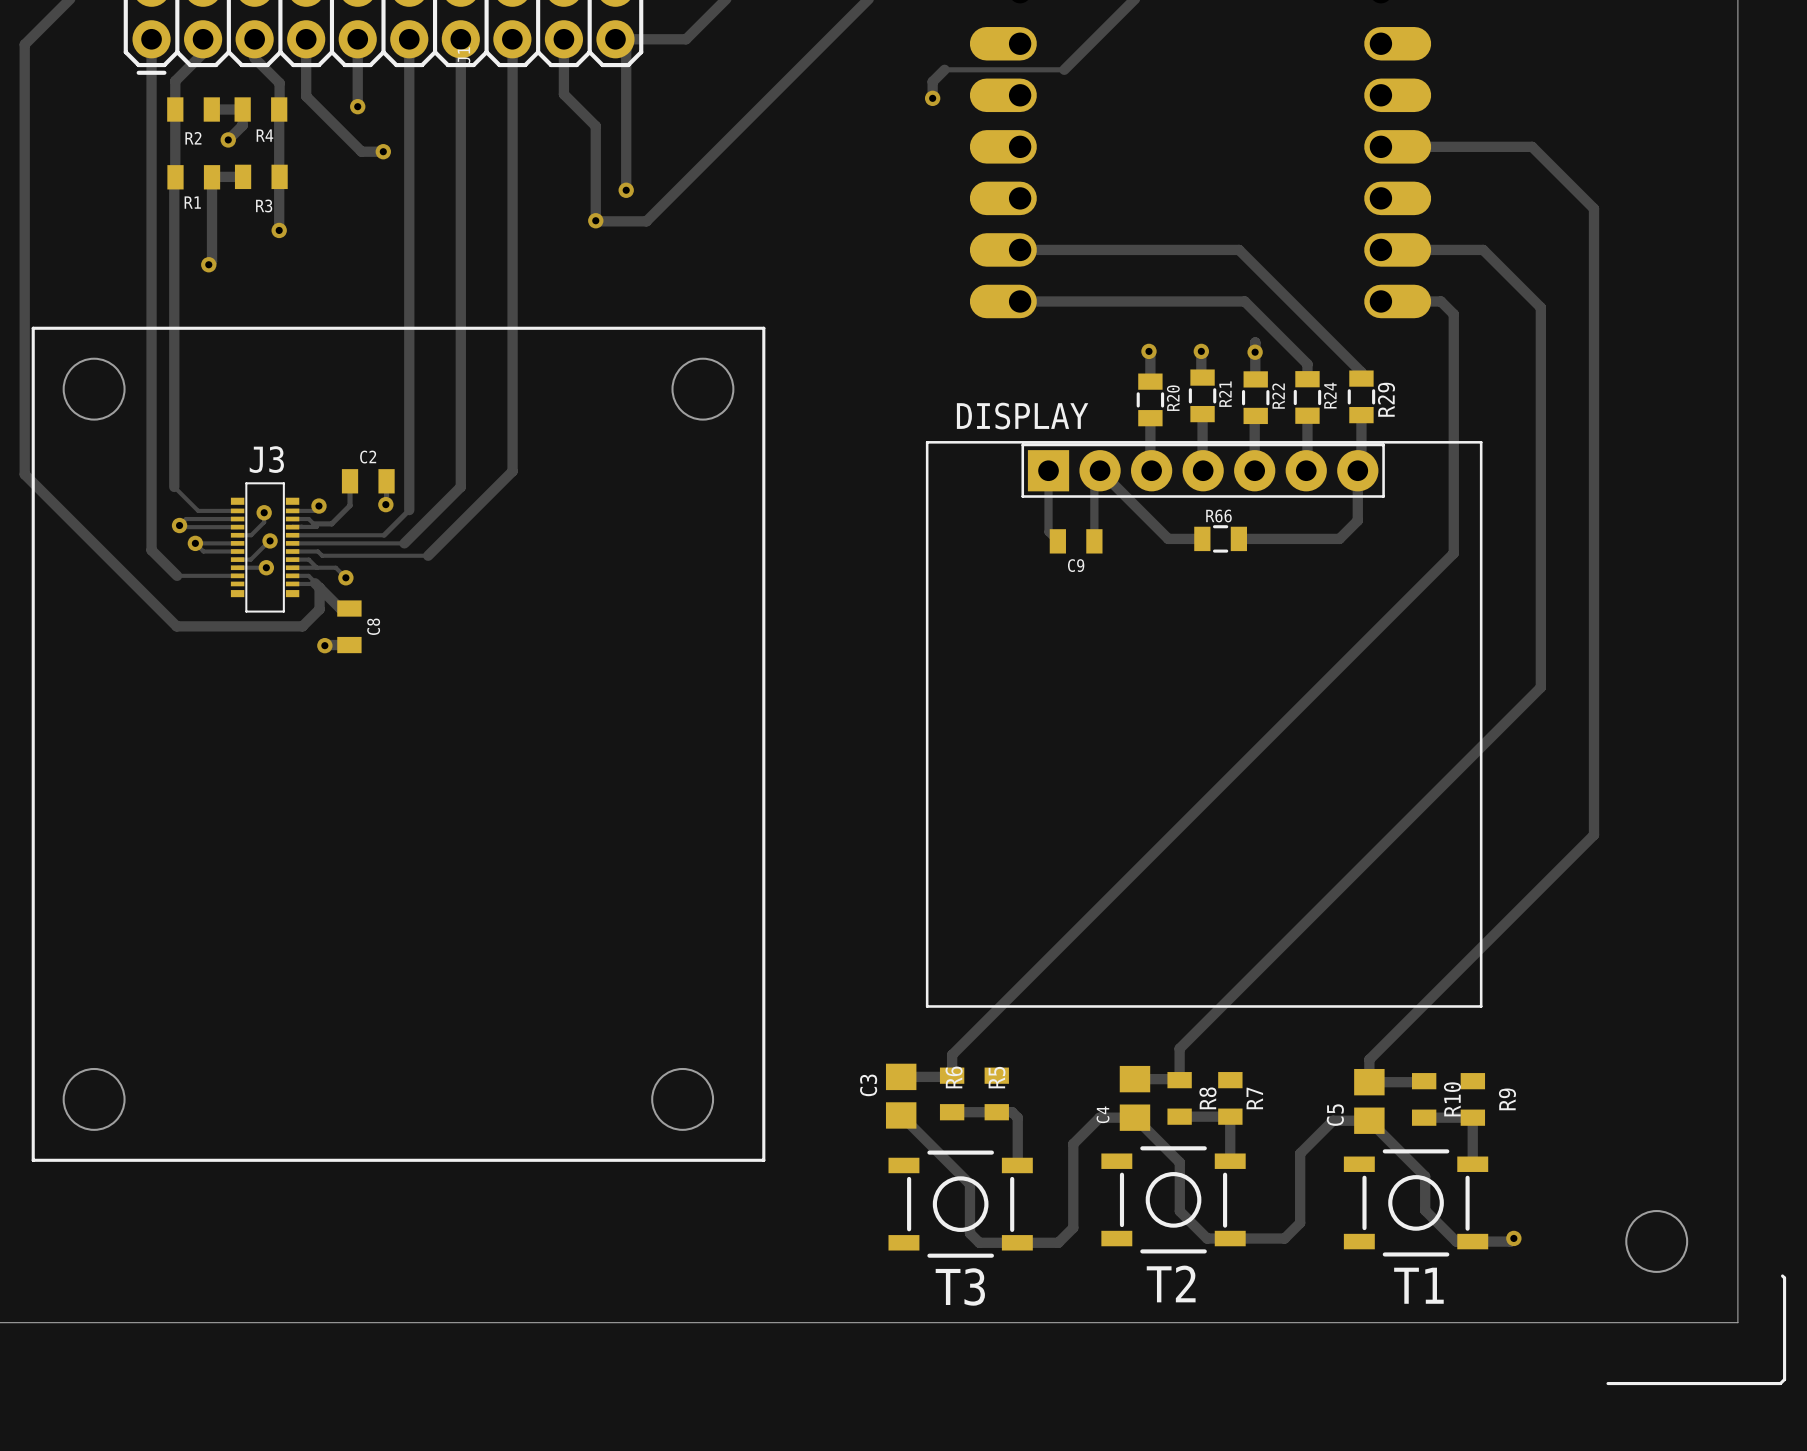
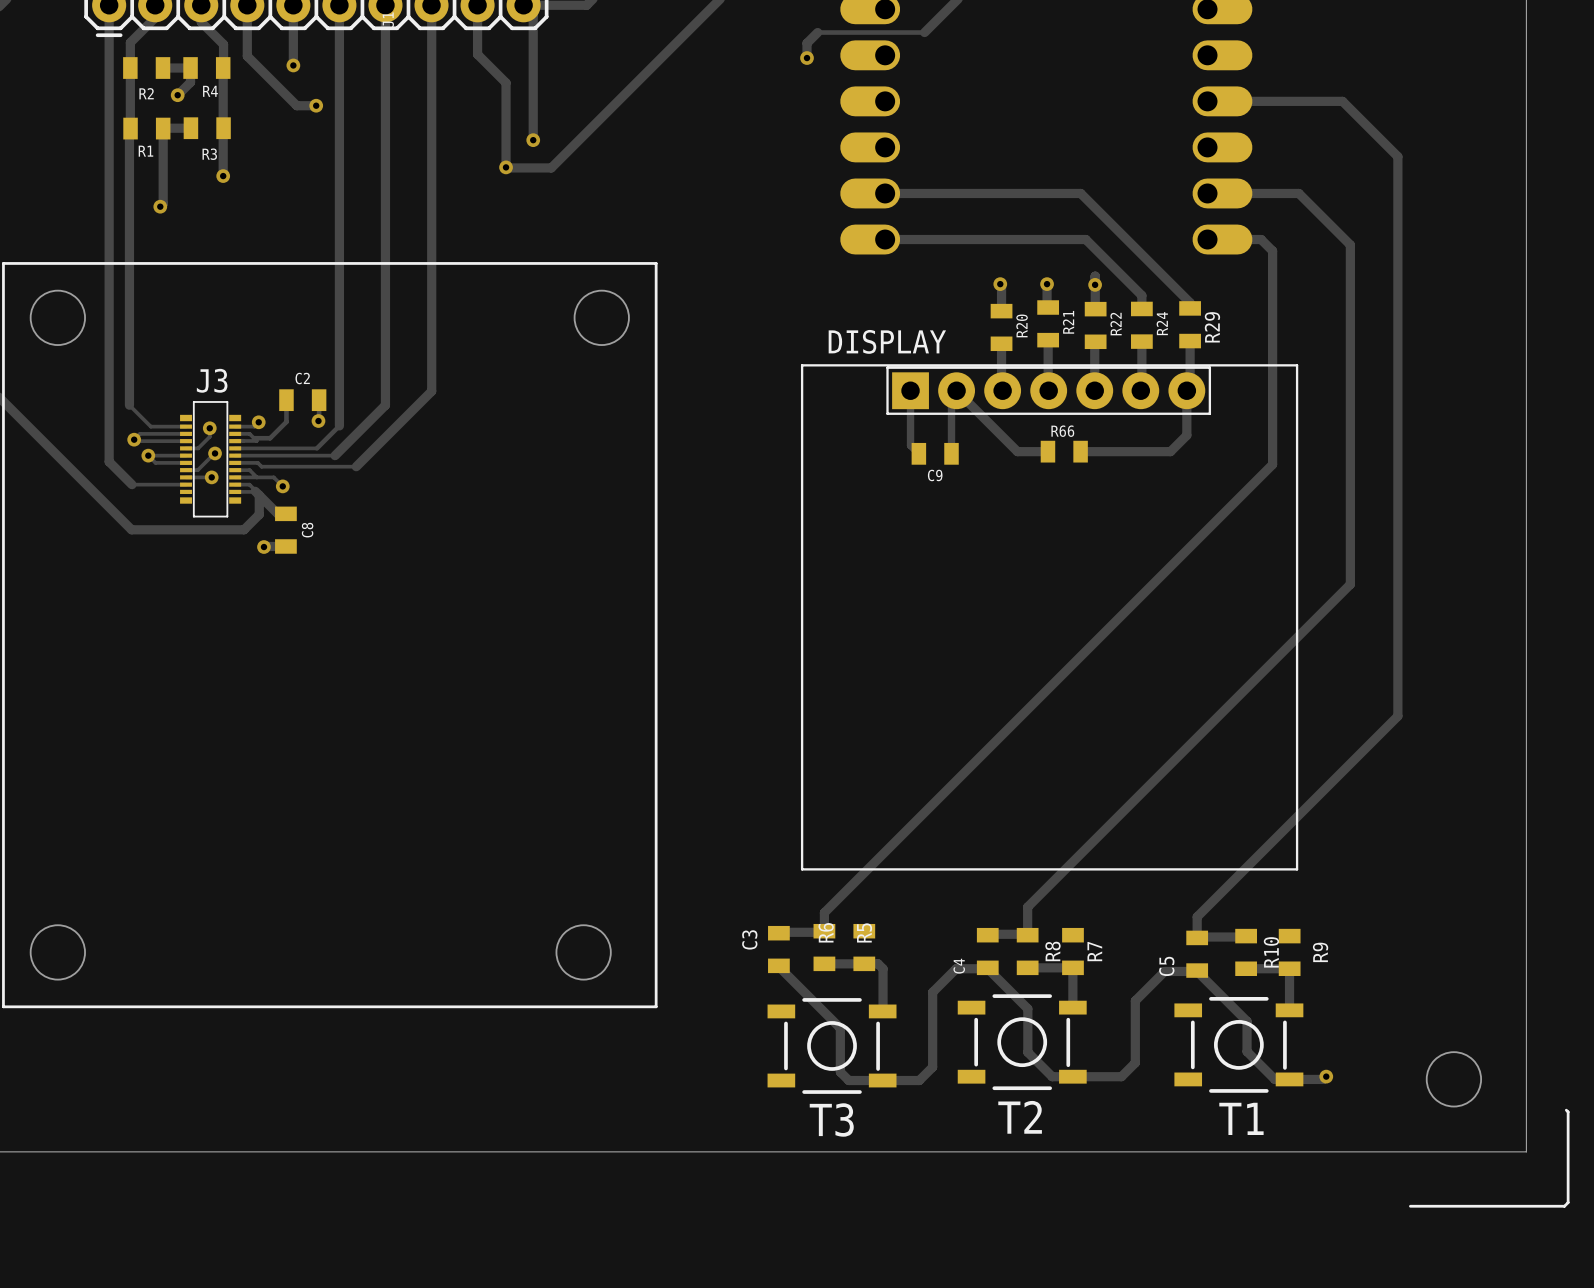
R21 footprint: [1188, 369, 1217, 423] -> [1037, 300, 1060, 348]
R29 footprint: [1347, 370, 1376, 424] -> [1179, 301, 1201, 349]
R22 footprint: [1242, 371, 1270, 425] -> [1084, 301, 1107, 350]
R24 footprint: [1293, 371, 1322, 424] -> [1131, 301, 1153, 349]
R20 footprint: [1136, 373, 1165, 427] -> [990, 303, 1013, 352]
R66 footprint: [1194, 525, 1247, 553] -> [1040, 440, 1088, 463]
C3 footprint: [885, 1063, 917, 1129] -> [768, 925, 790, 974]
C4 footprint: [1119, 1065, 1151, 1131] -> [976, 927, 999, 976]
C5 footprint: [1354, 1068, 1385, 1134] -> [1186, 930, 1209, 978]

